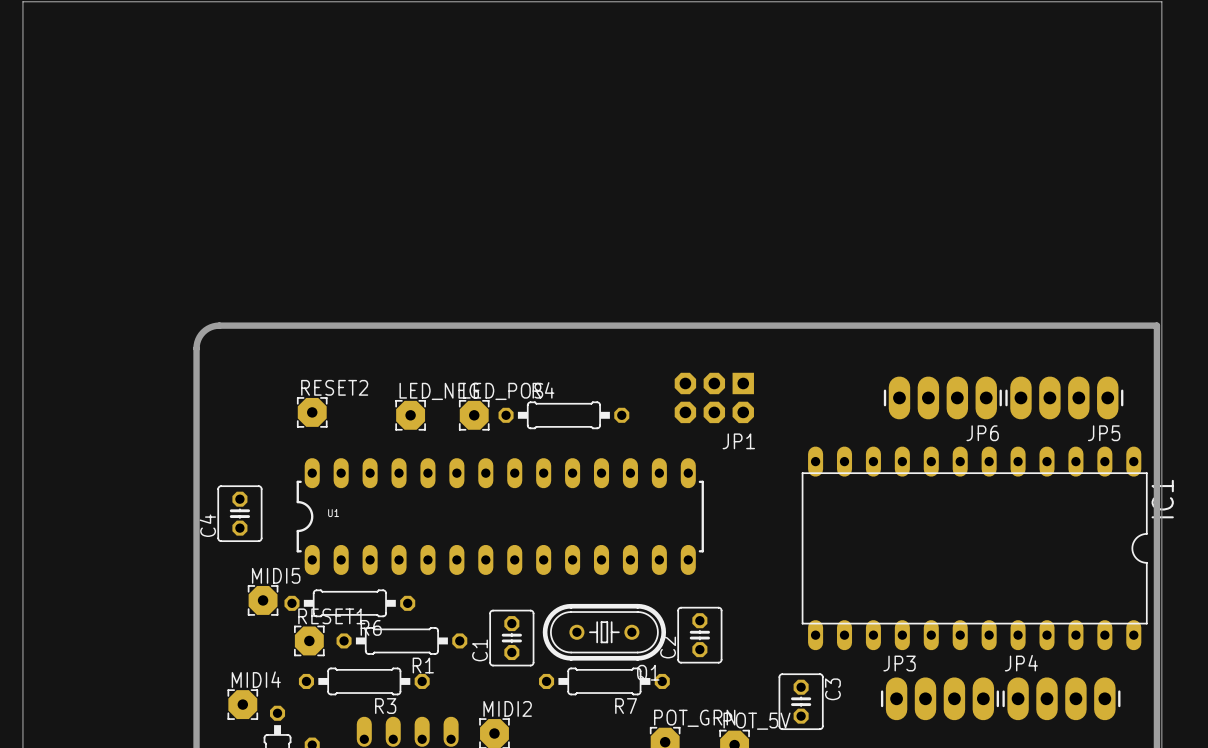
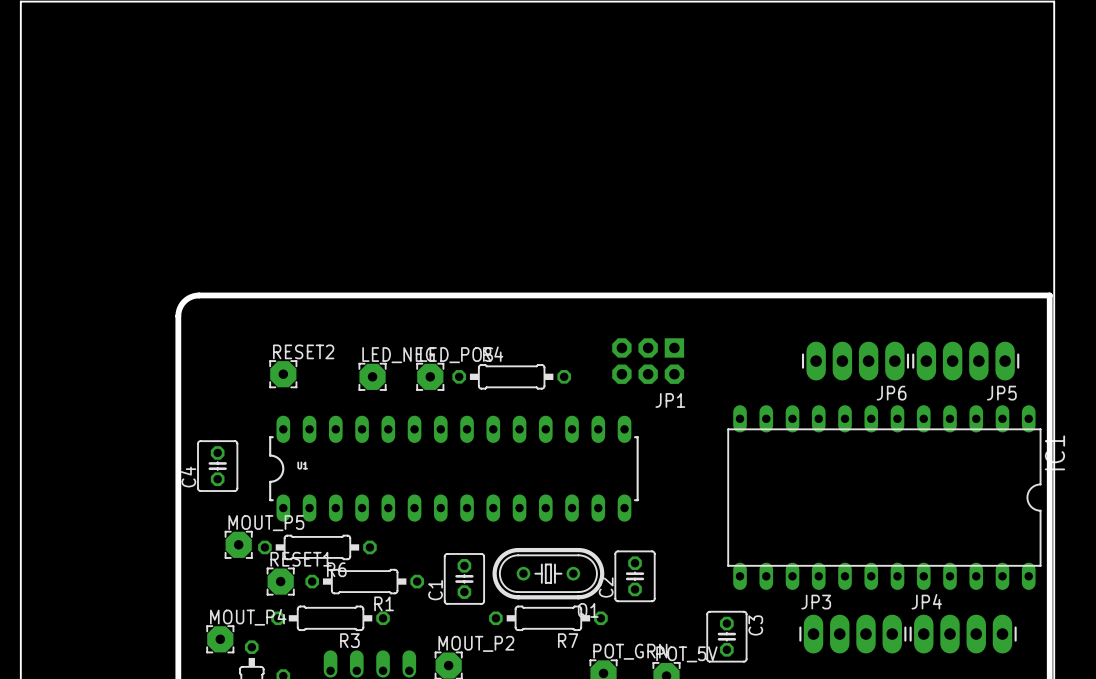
MIDI5 name: MIDI5 (276, 575) -> MOUT_P5 (266, 523)
MIDI4 name: MIDI4 (256, 679) -> MOUT_P4 (248, 617)
MIDI2 name: MIDI2 (507, 708) -> MOUT_P2 (476, 643)

